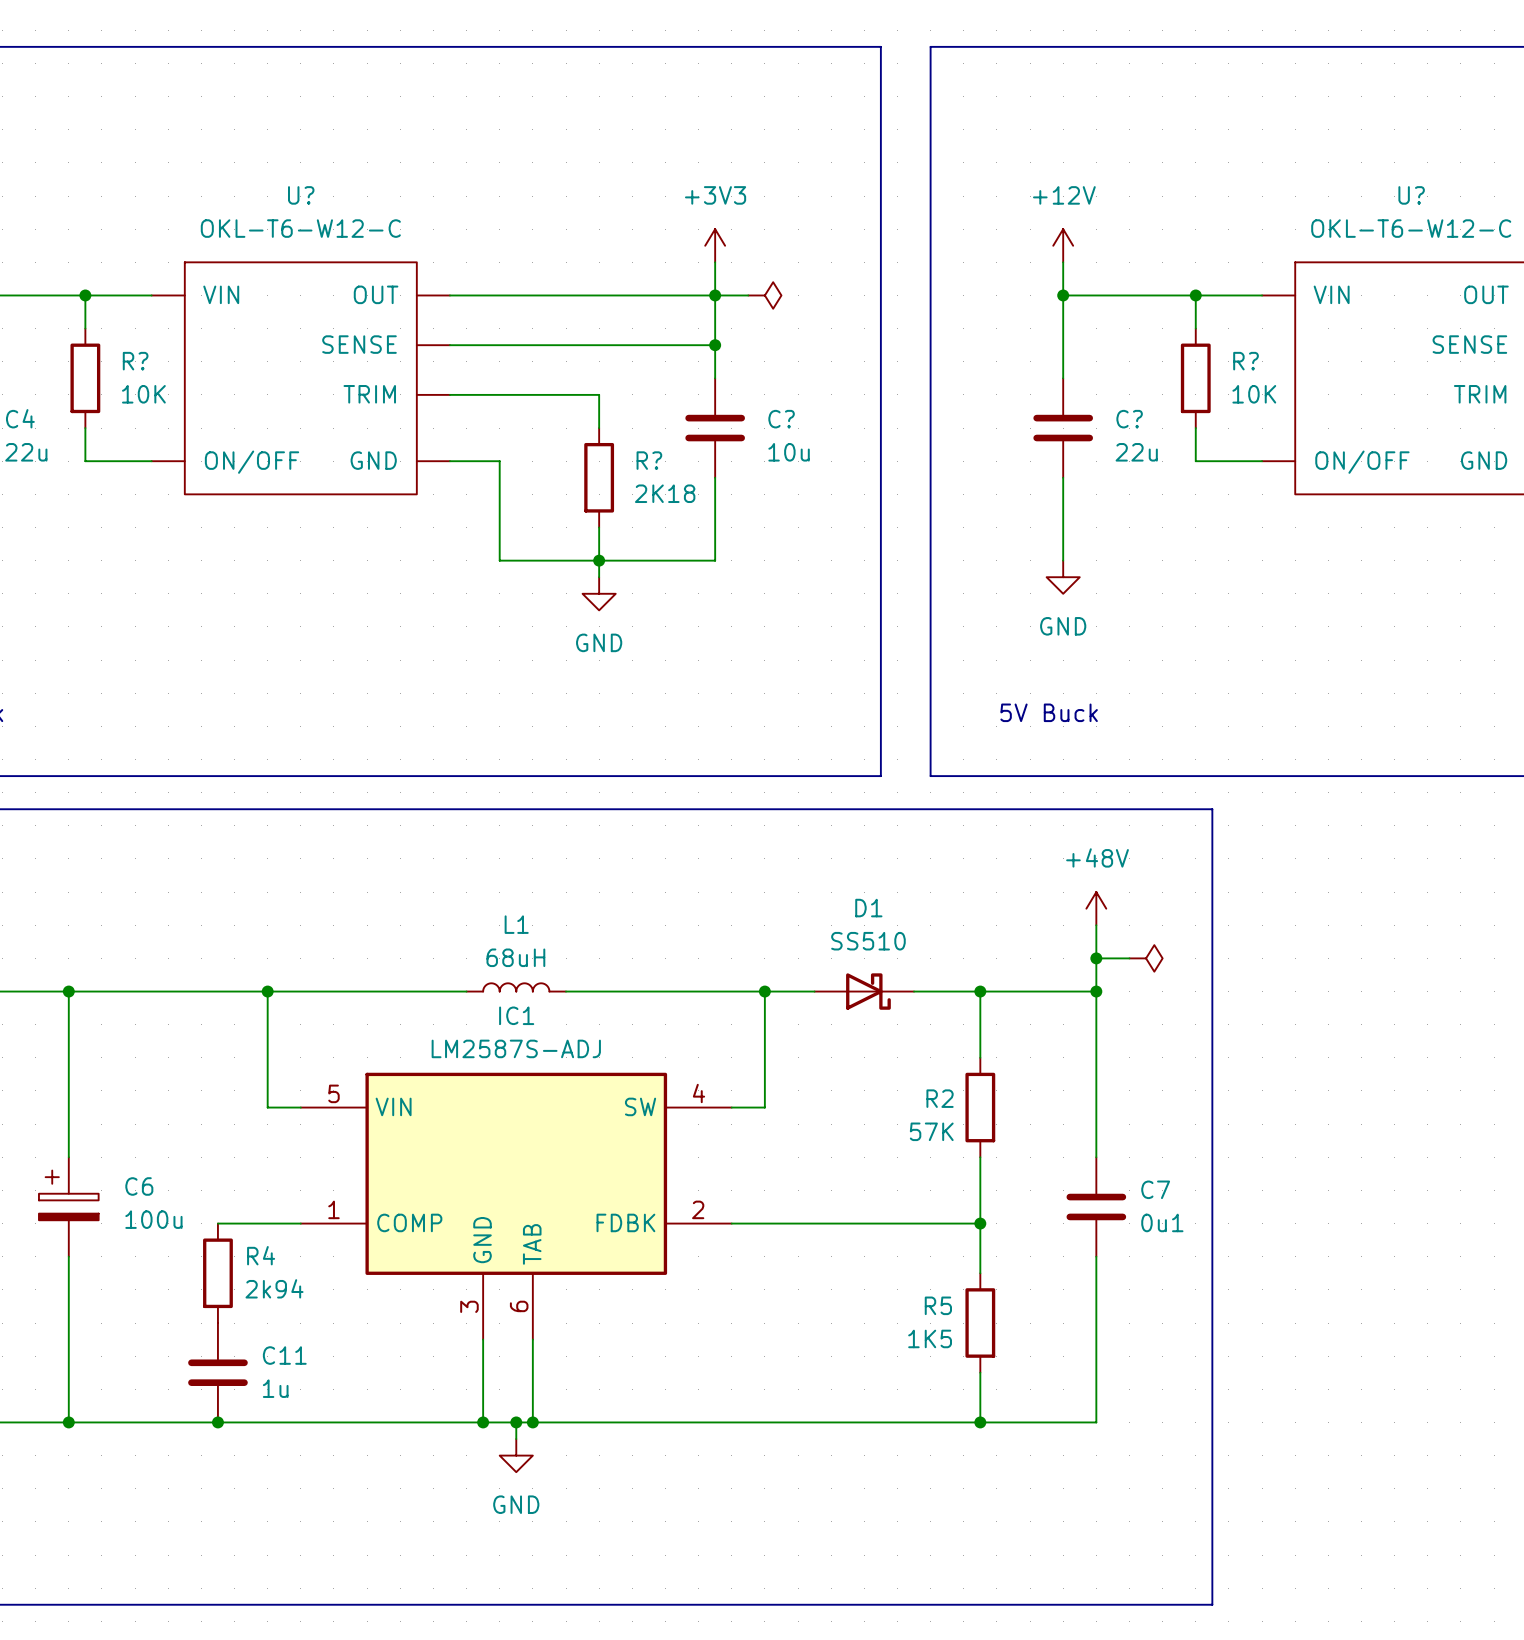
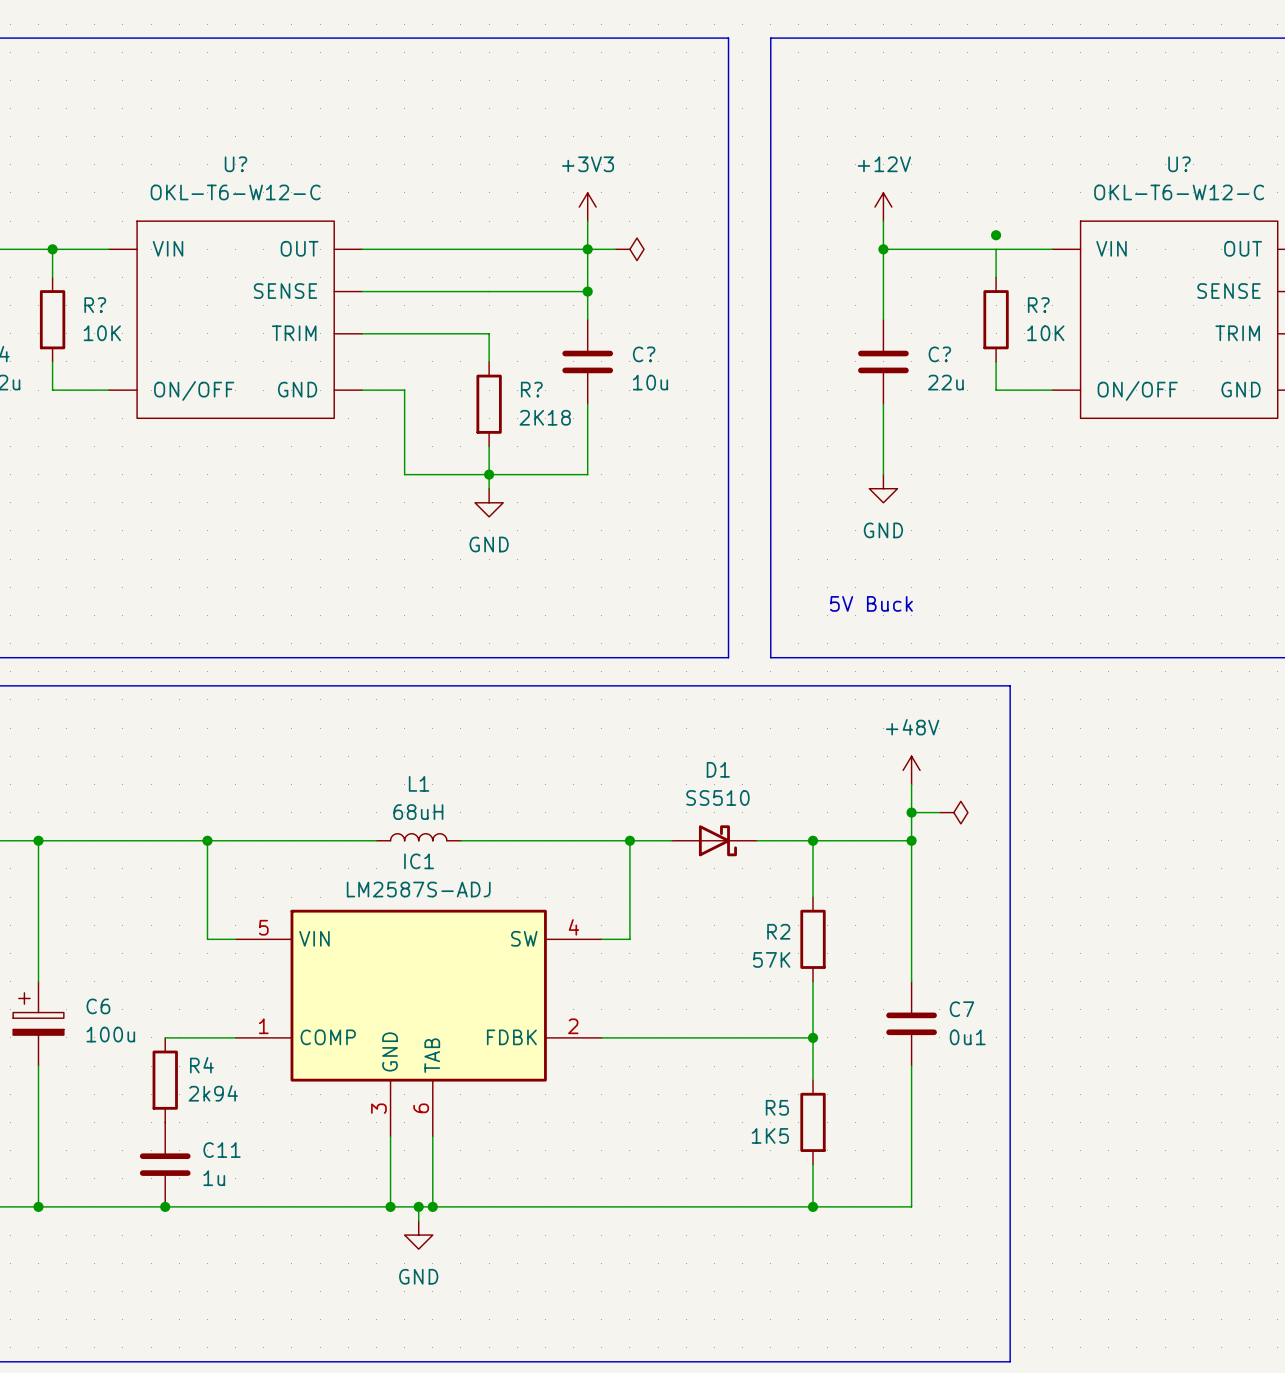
junction position: (1195, 295) -> (996, 235)

